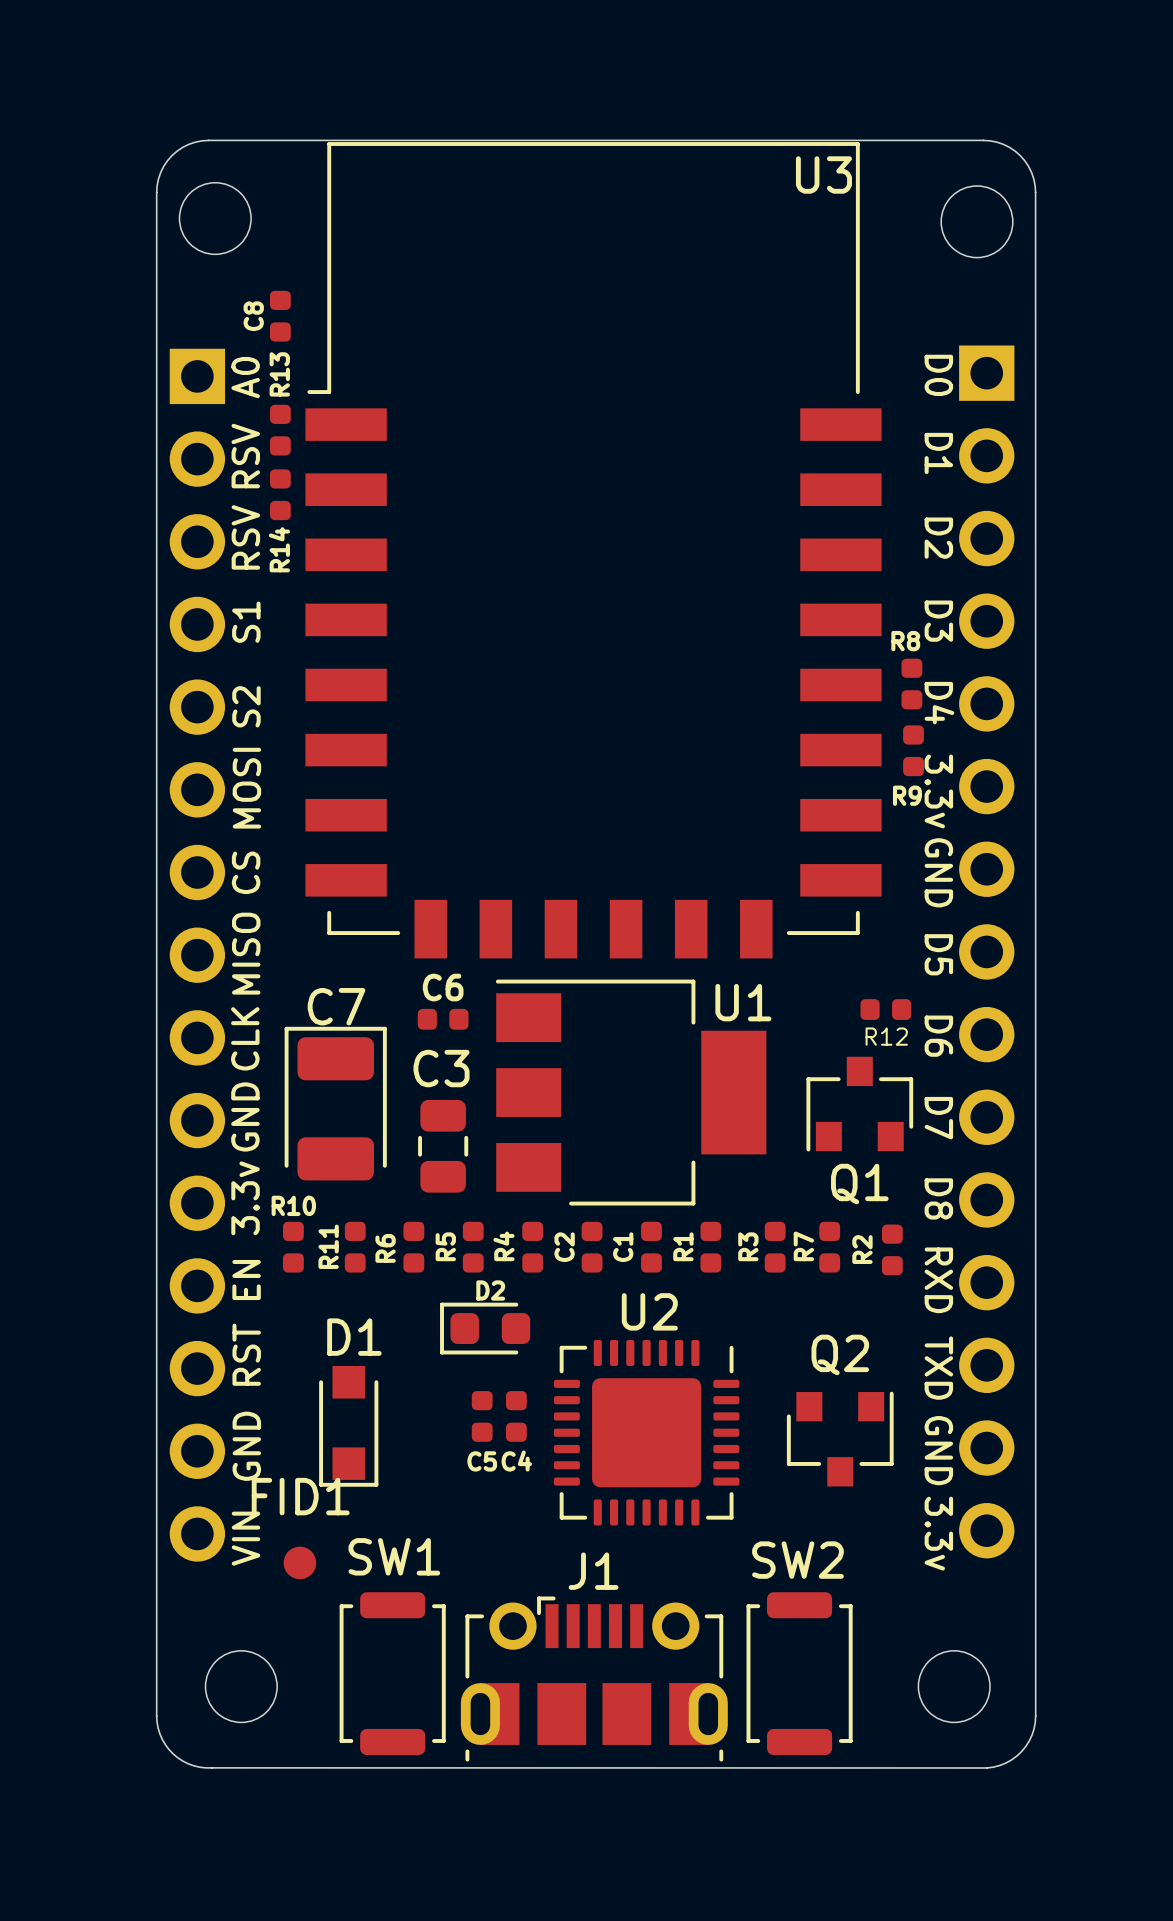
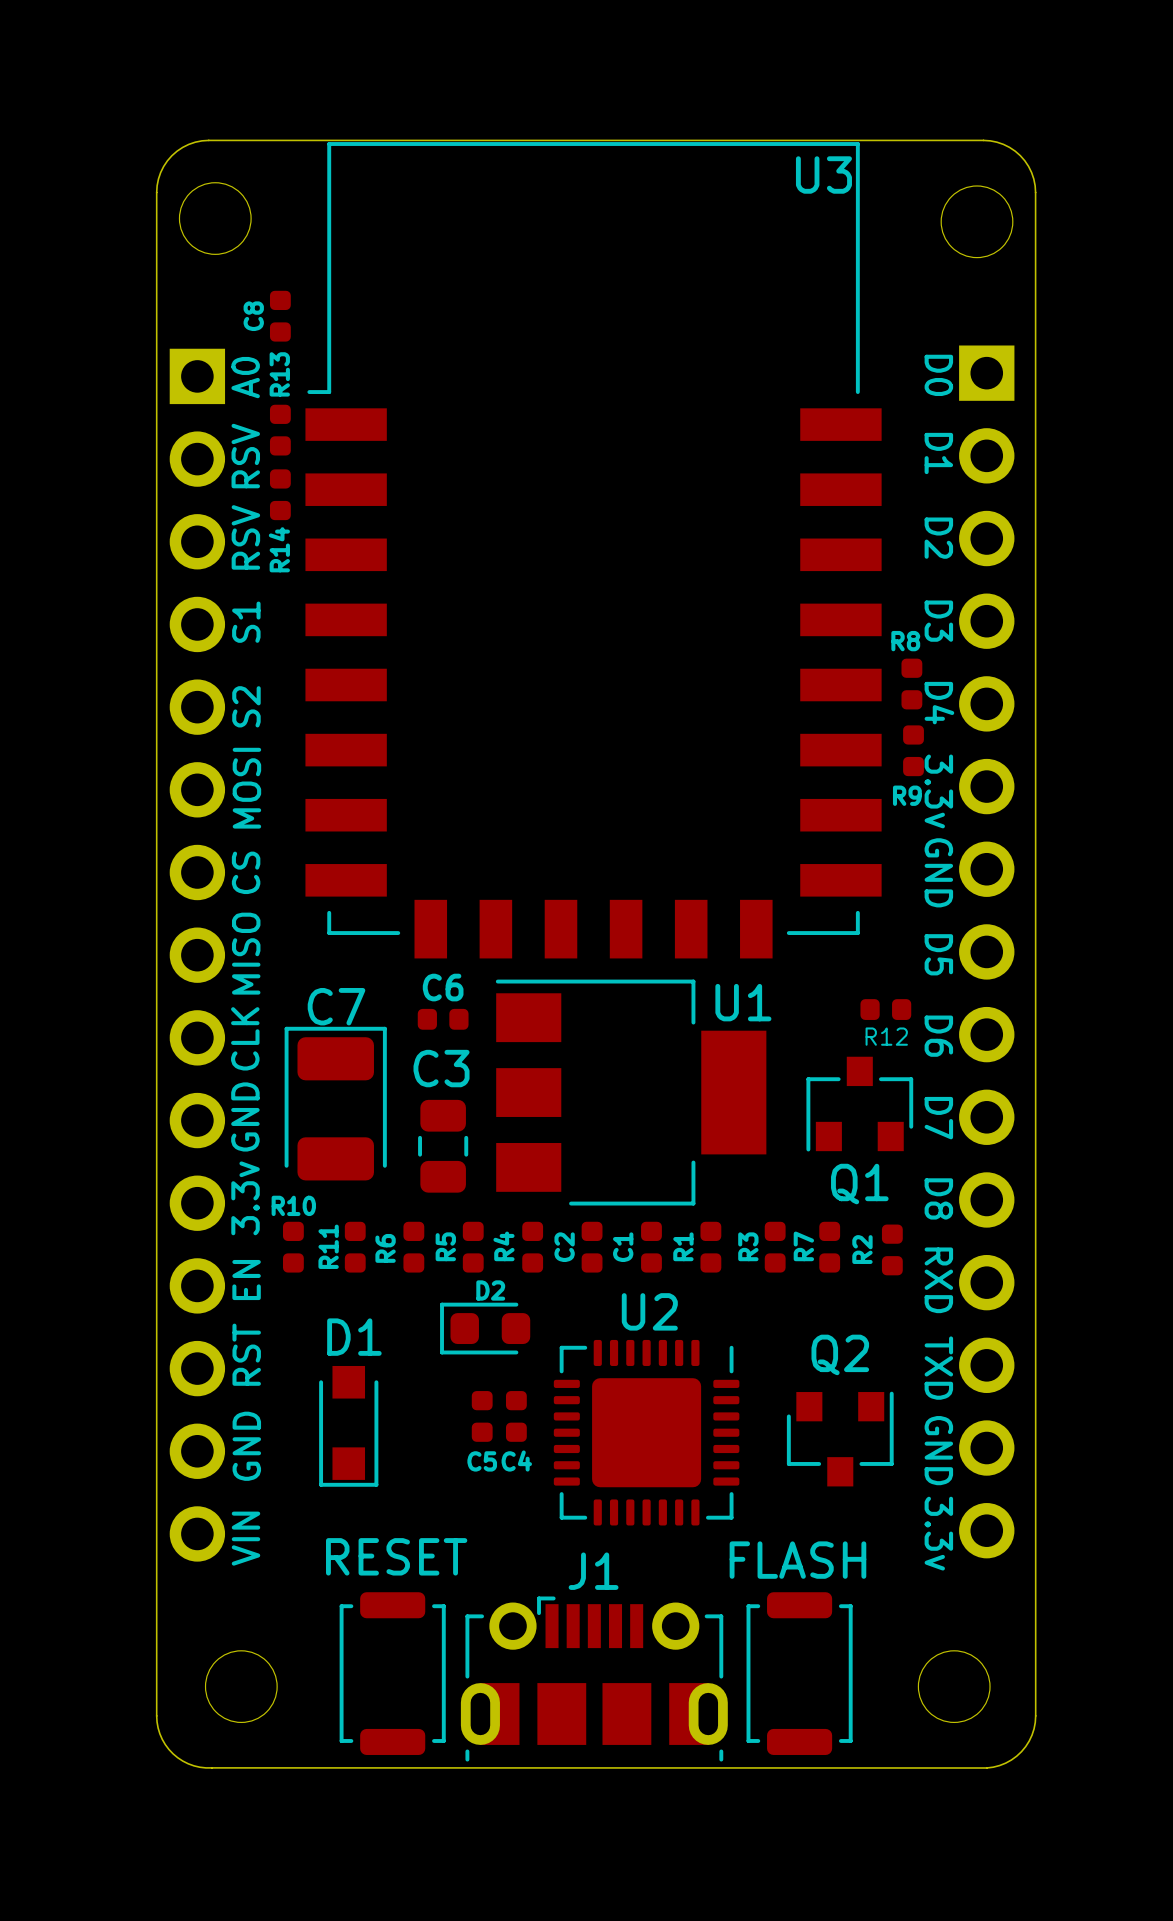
SW1 name: SW1 (394, 1556) -> RESET (396, 1556)
SW2 name: SW2 (797, 1560) -> FLASH (797, 1560)
FID1: (299, 1562) -> none

